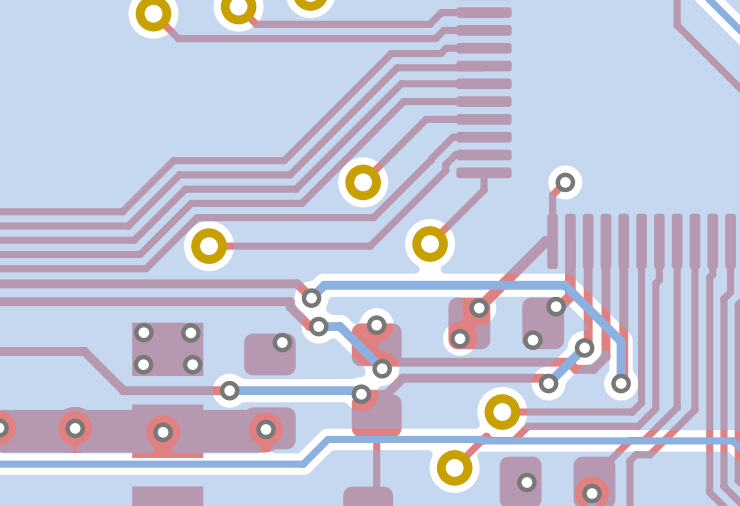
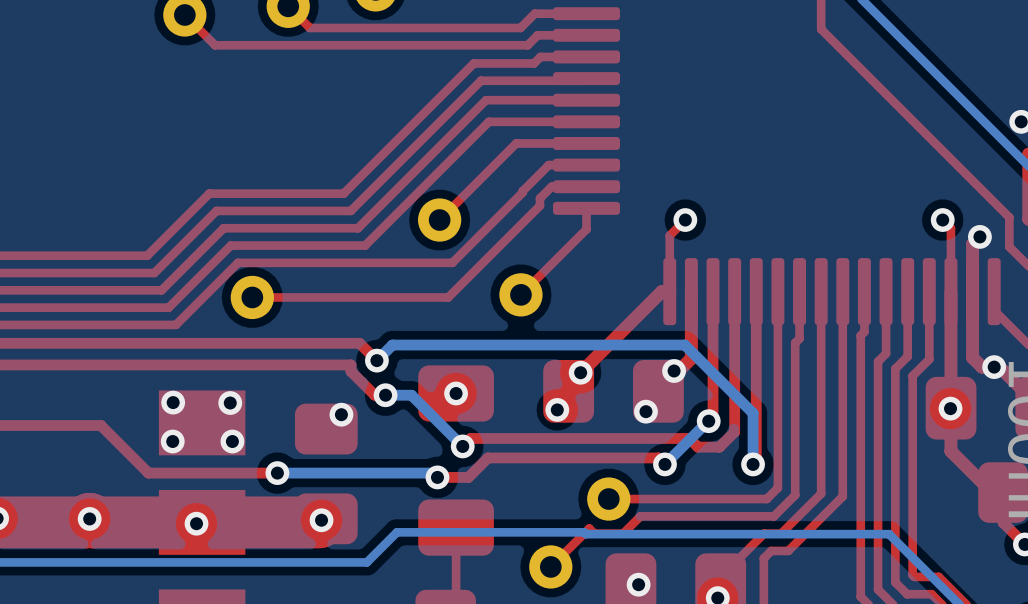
part footprint: [351, 323, 402, 438] -> [418, 365, 494, 556]

